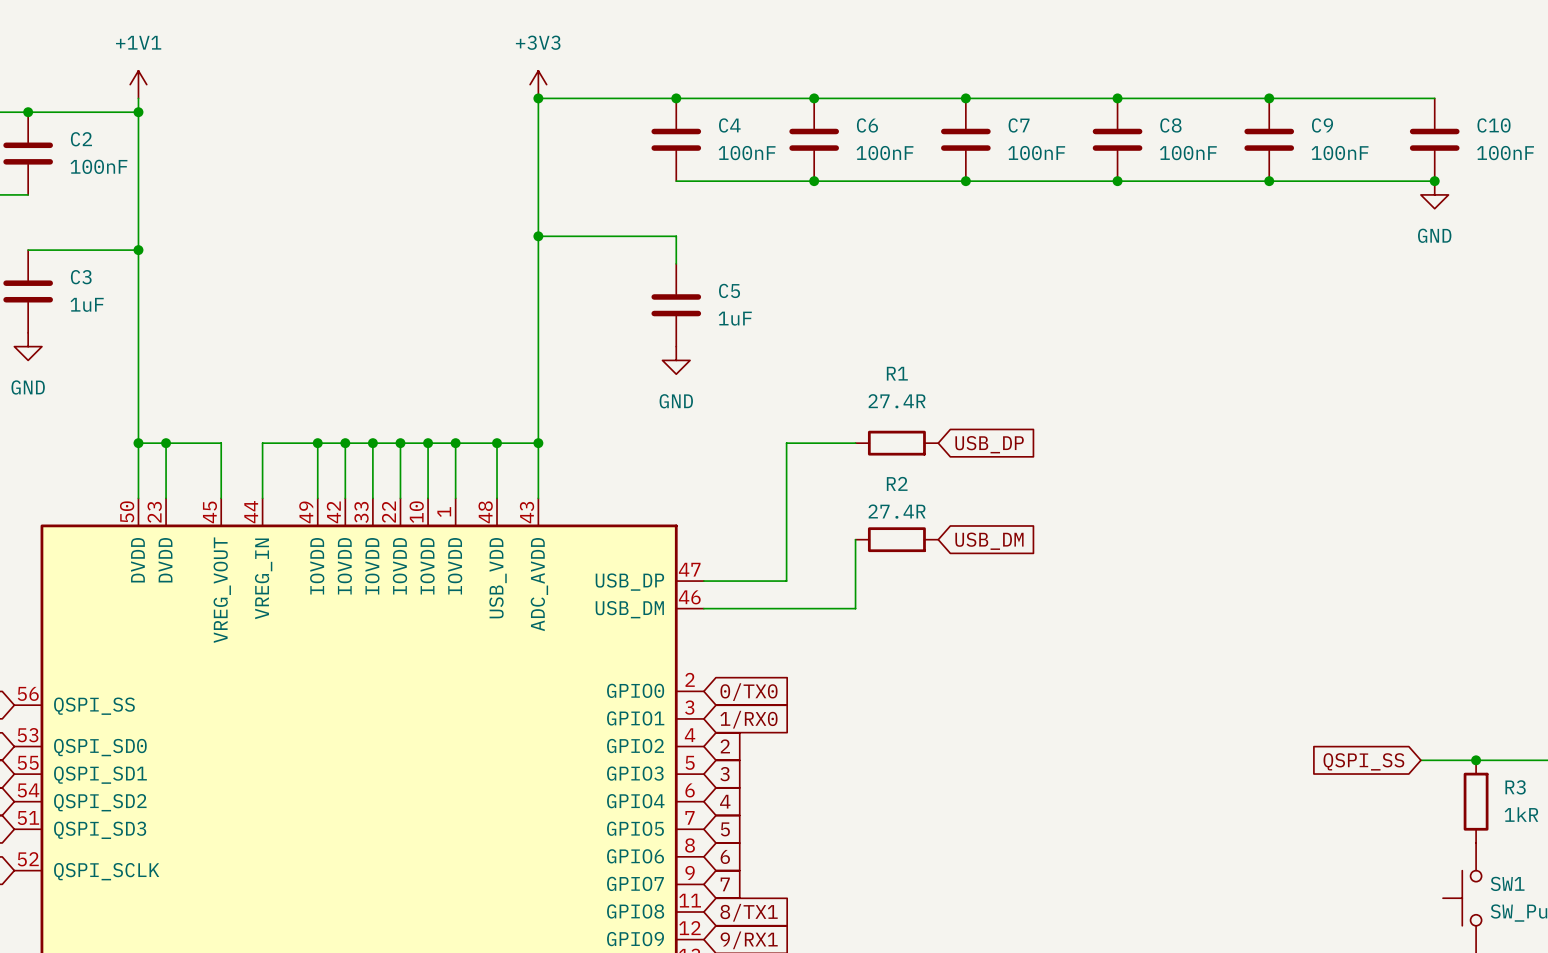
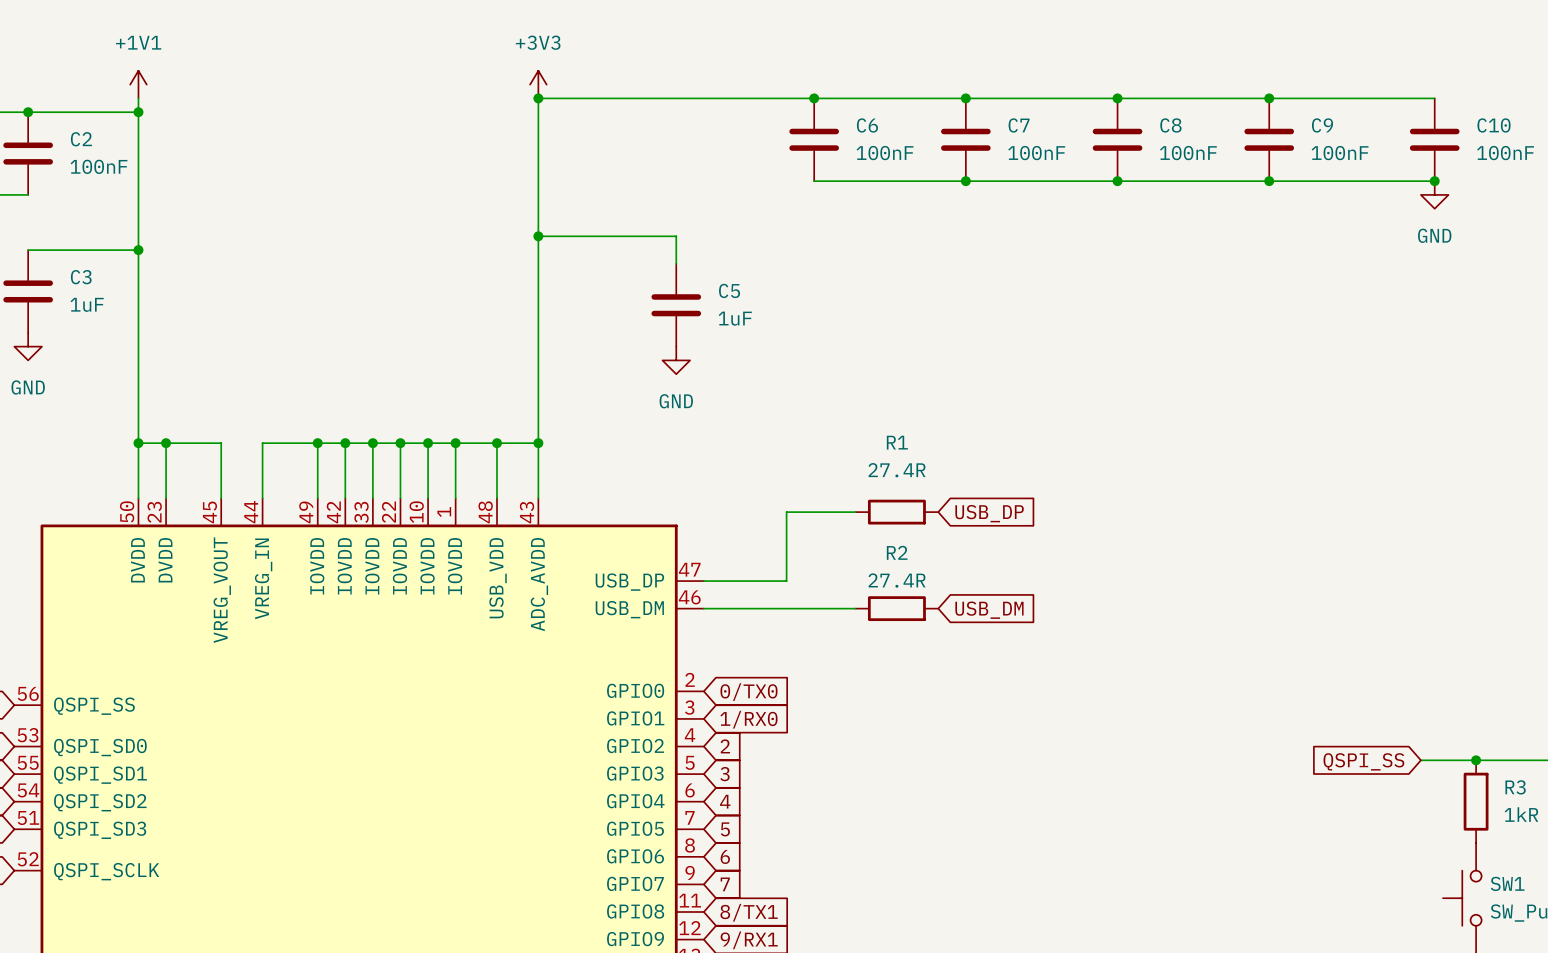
junction: (676, 98) -> none
C4: 100nF (676, 139) -> none
wire: (676, 181) (814, 181) -> none
junction: (814, 181) -> none
wire: (855, 443) (786, 443) (786, 512) -> (855, 512) (786, 512)
R1 position: (896, 443) -> (896, 512)
global label position: USB_DP (989, 444) -> USB_DP (989, 513)
wire: (855, 539) (855, 608) -> none
R2 position: (896, 539) -> (896, 608)
global label position: USB_DM (989, 541) -> USB_DM (989, 610)

